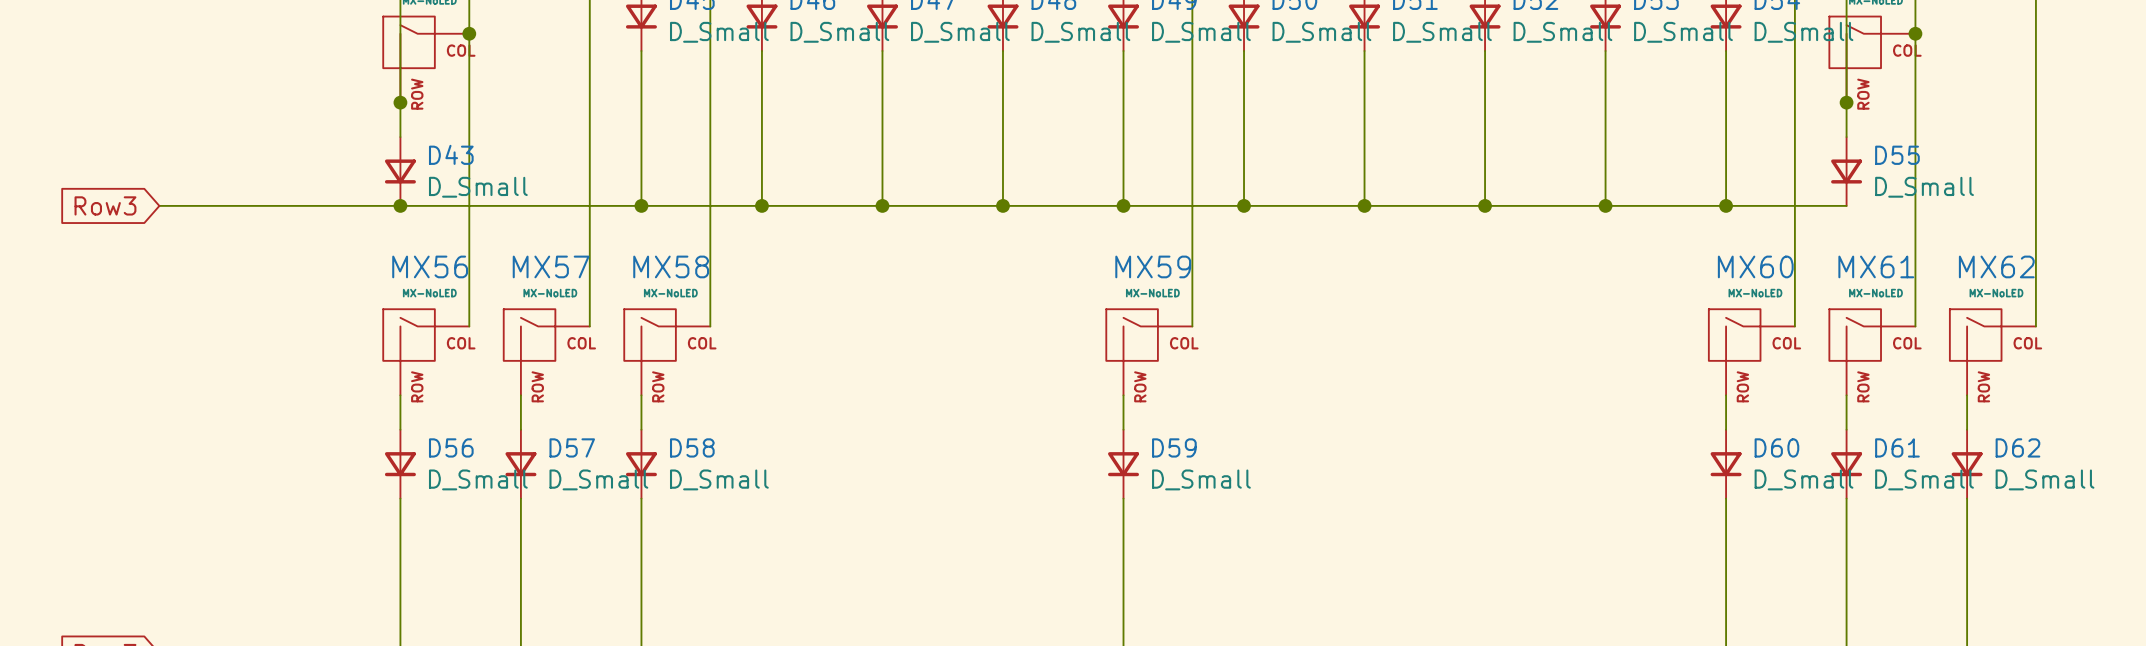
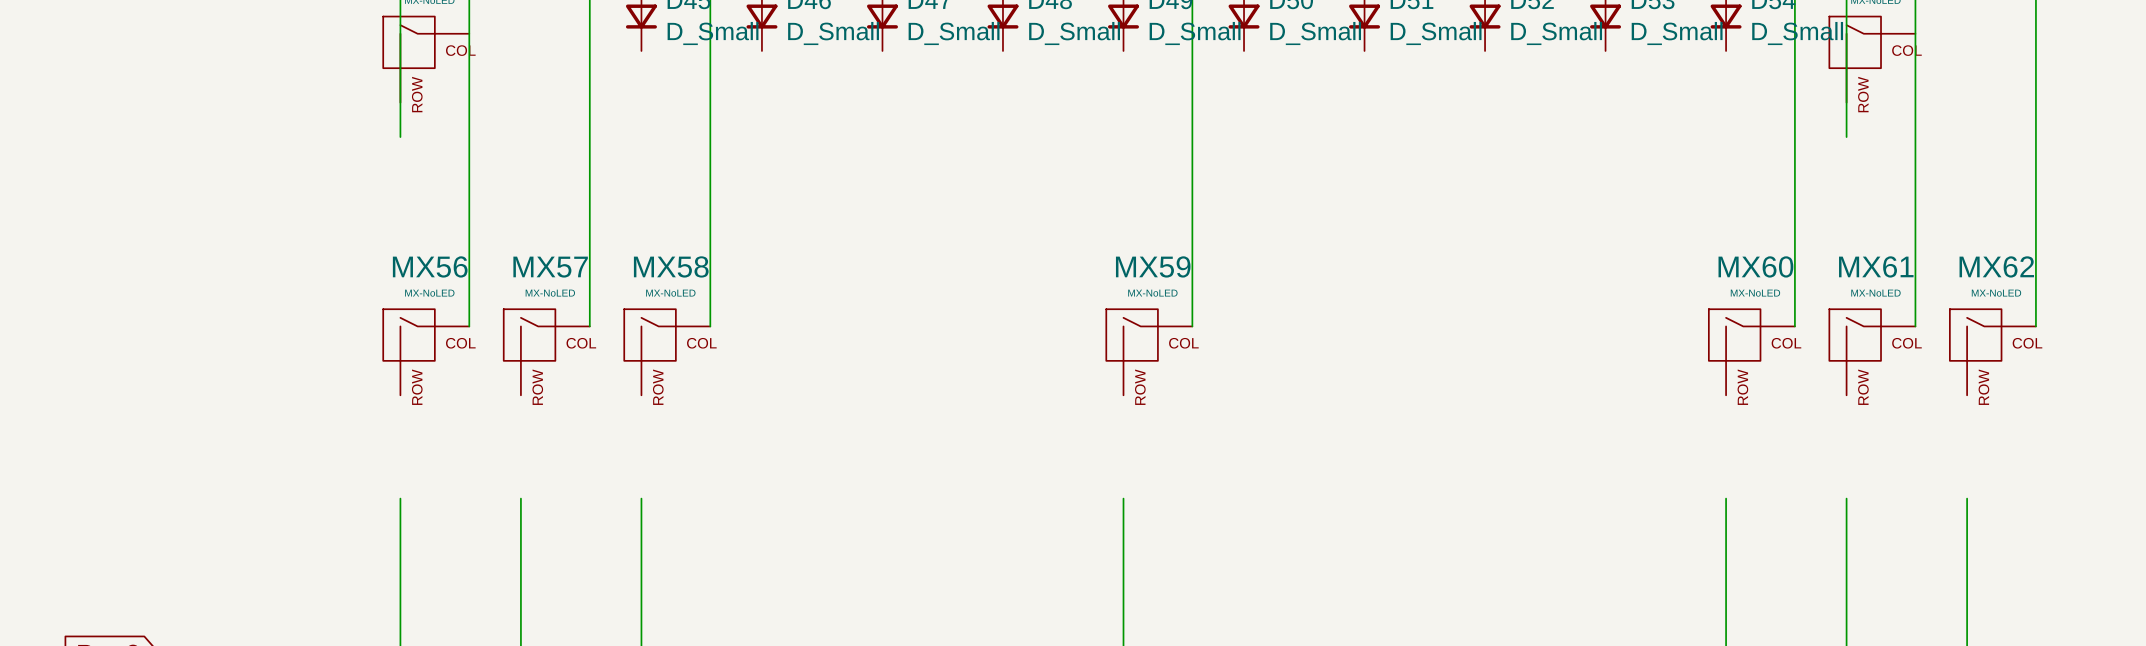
junction: (469, 33) -> none
junction: (1915, 33) -> none
wire: (641, 50) (641, 205) -> none
wire: (761, 50) (761, 205) -> none
wire: (882, 50) (882, 205) -> none
wire: (1002, 50) (1002, 205) -> none
wire: (1123, 50) (1123, 205) -> none
wire: (1244, 50) (1244, 205) -> none
wire: (1364, 50) (1364, 205) -> none
wire: (1485, 50) (1485, 205) -> none
wire: (1605, 50) (1605, 205) -> none
wire: (1726, 50) (1726, 205) -> none
junction: (400, 102) -> none
junction: (1846, 102) -> none
D43: D_Small (400, 171) -> none
D55: D_Small (1846, 171) -> none
global label: Row3 (105, 205) -> none
wire: (159, 205) (1846, 205) -> none
junction: (400, 205) -> none
junction: (641, 205) -> none
junction: (761, 205) -> none
junction: (882, 205) -> none
junction: (1002, 205) -> none
junction: (1123, 205) -> none
junction: (1244, 205) -> none
junction: (1364, 205) -> none
junction: (1485, 205) -> none
junction: (1605, 205) -> none
junction: (1726, 205) -> none
wire: (400, 395) (400, 429) -> none
wire: (520, 395) (520, 429) -> none
wire: (641, 395) (641, 429) -> none
wire: (1123, 395) (1123, 429) -> none
wire: (1726, 395) (1726, 429) -> none
wire: (1846, 395) (1846, 429) -> none
wire: (1967, 395) (1967, 429) -> none
D56: D_Small (400, 464) -> none
D57: D_Small (520, 464) -> none
D58: D_Small (641, 464) -> none
D59: D_Small (1123, 464) -> none
D60: D_Small (1726, 464) -> none
D61: D_Small (1846, 464) -> none
D62: D_Small (1967, 464) -> none

